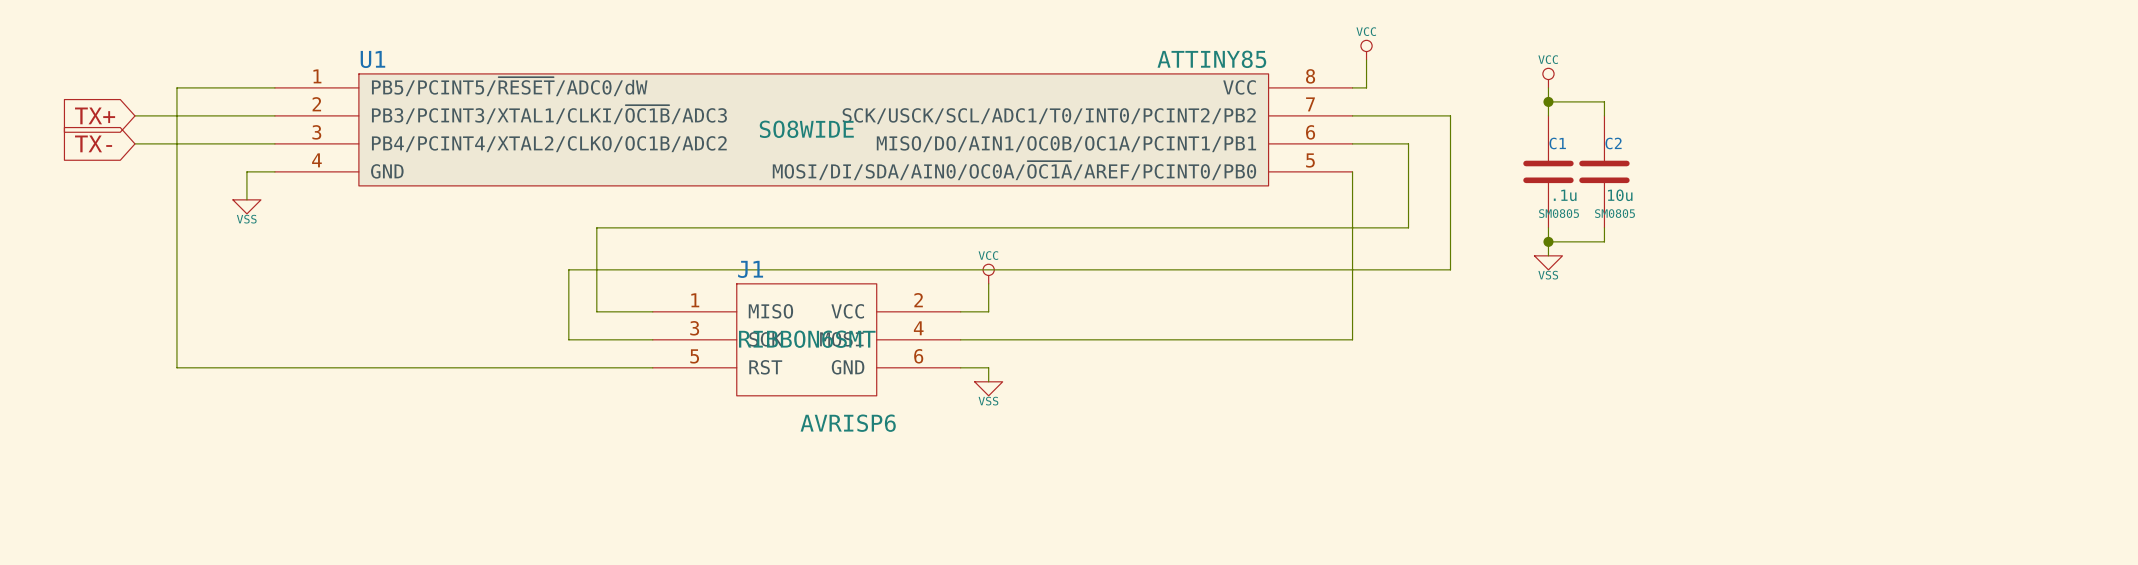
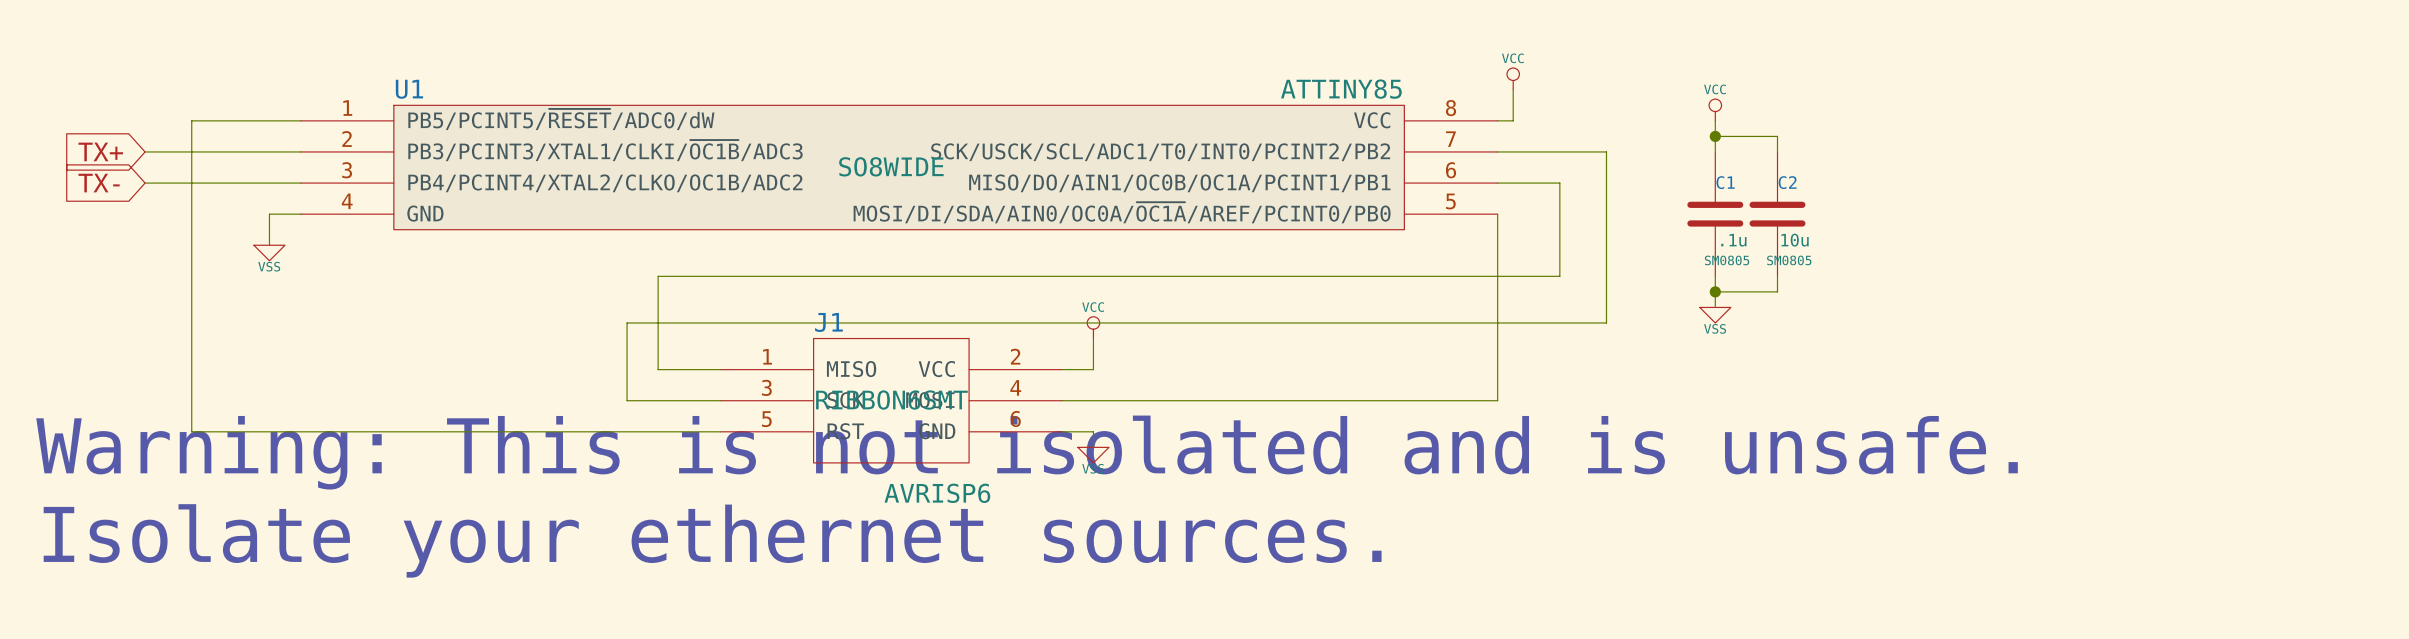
text: none -> Warning: This is not isolated and is unsafe. (1027, 452)
text: none -> Isolate your ethernet sources. (712, 540)

